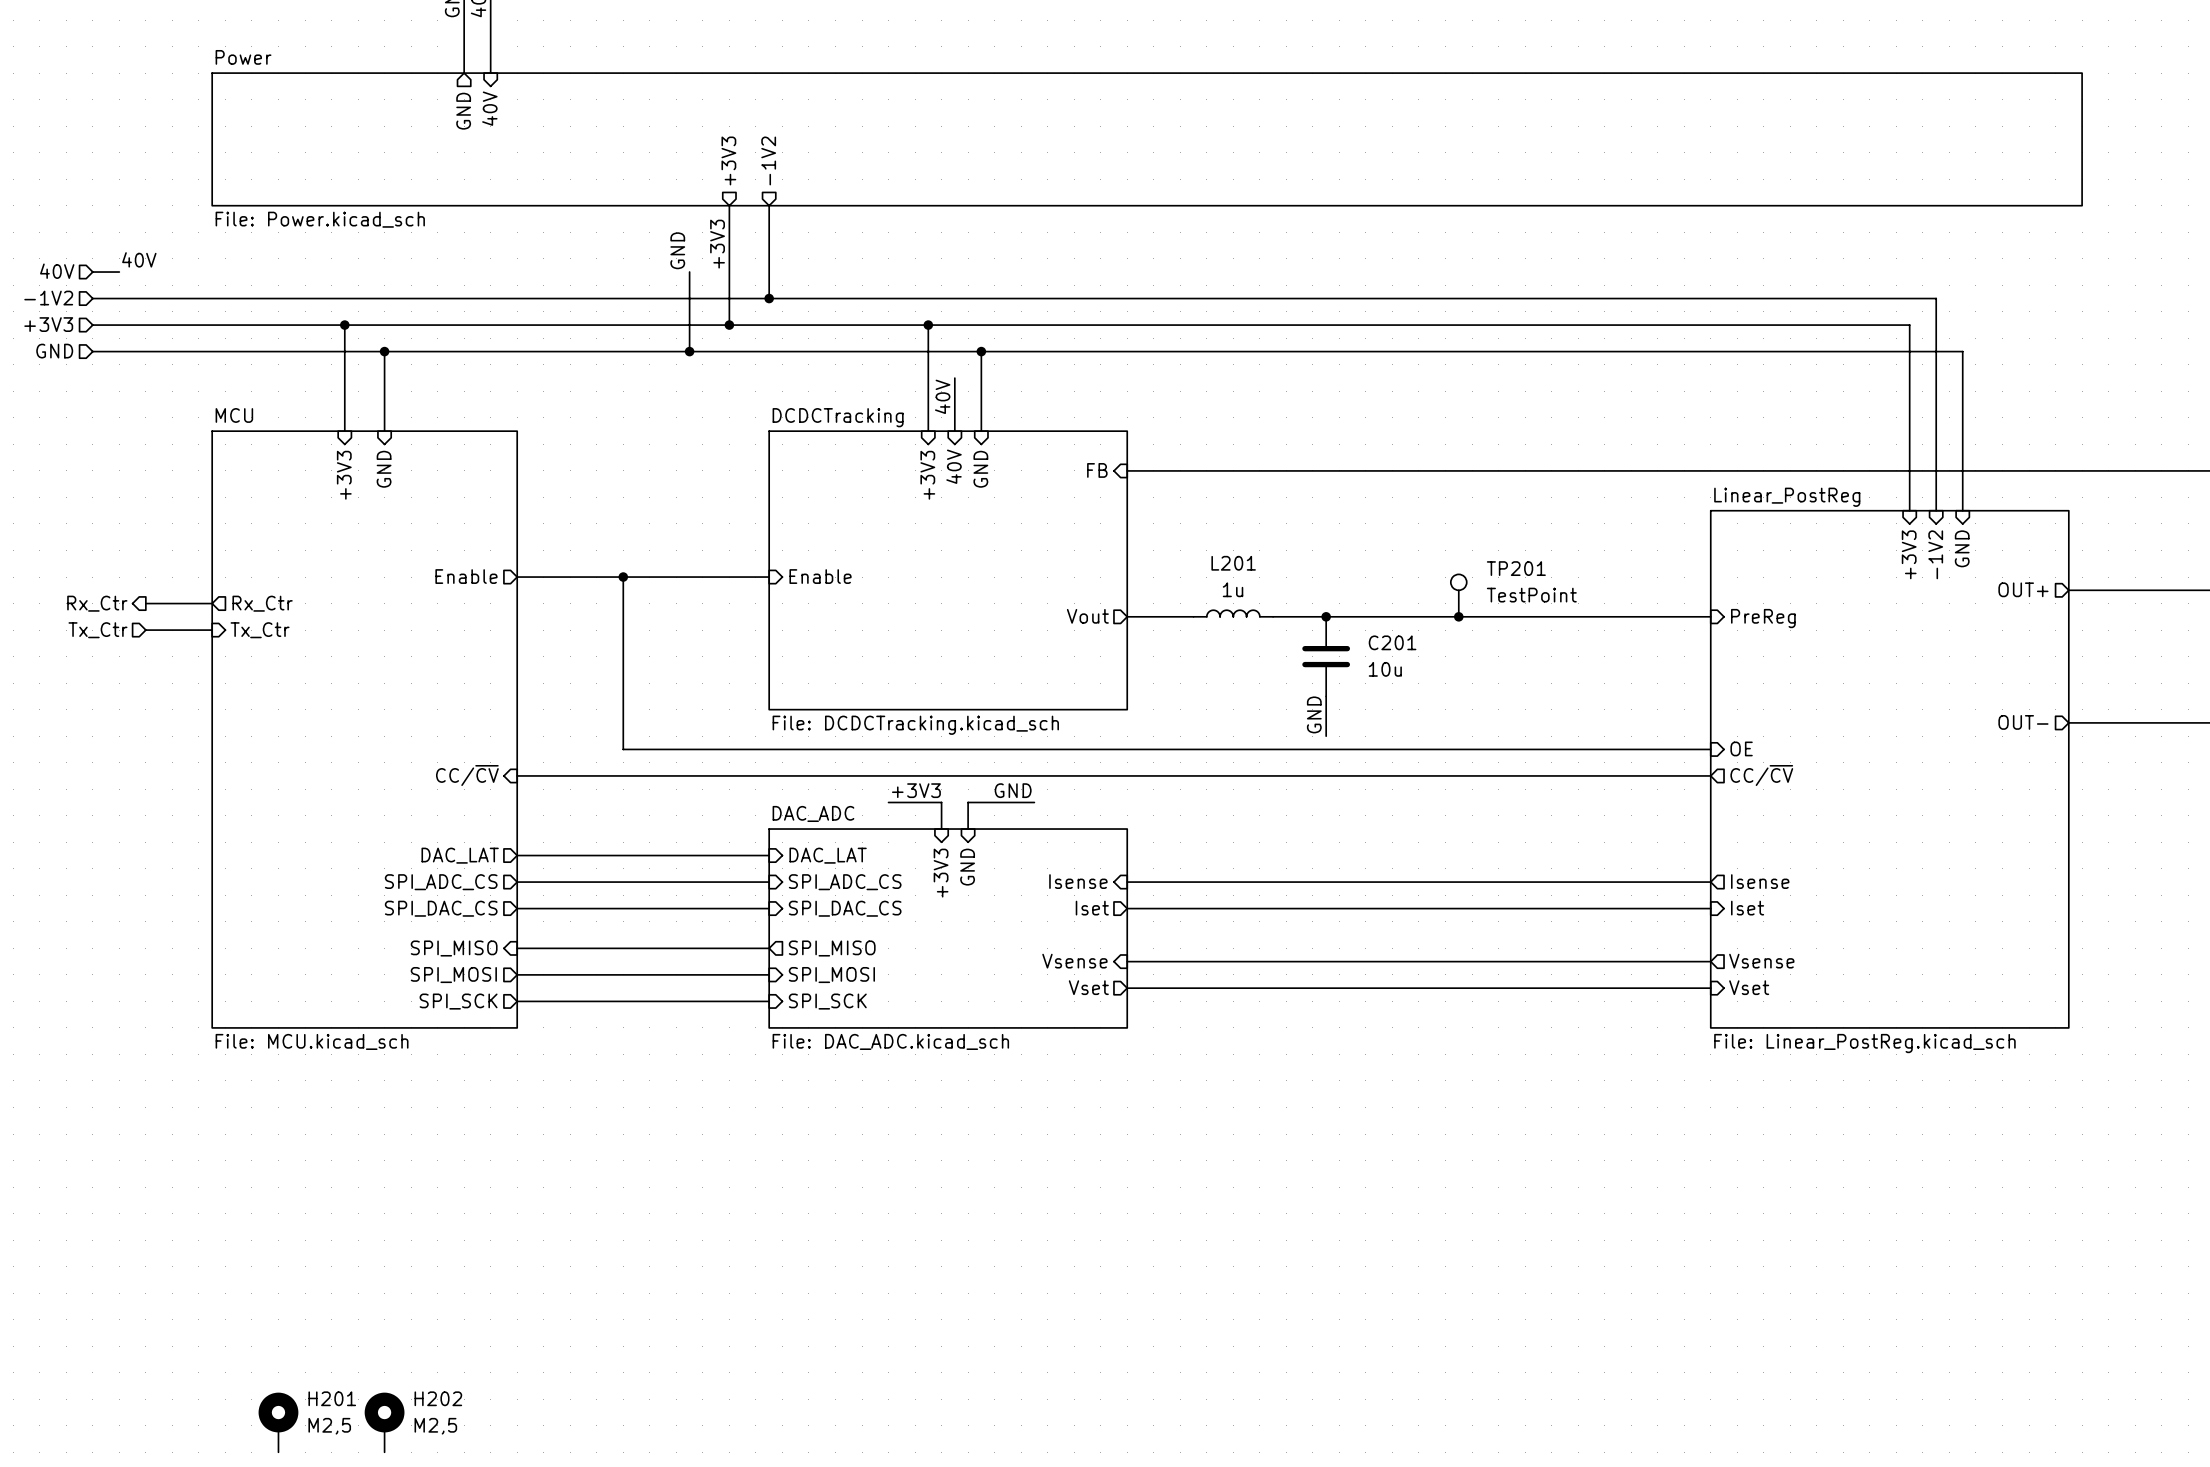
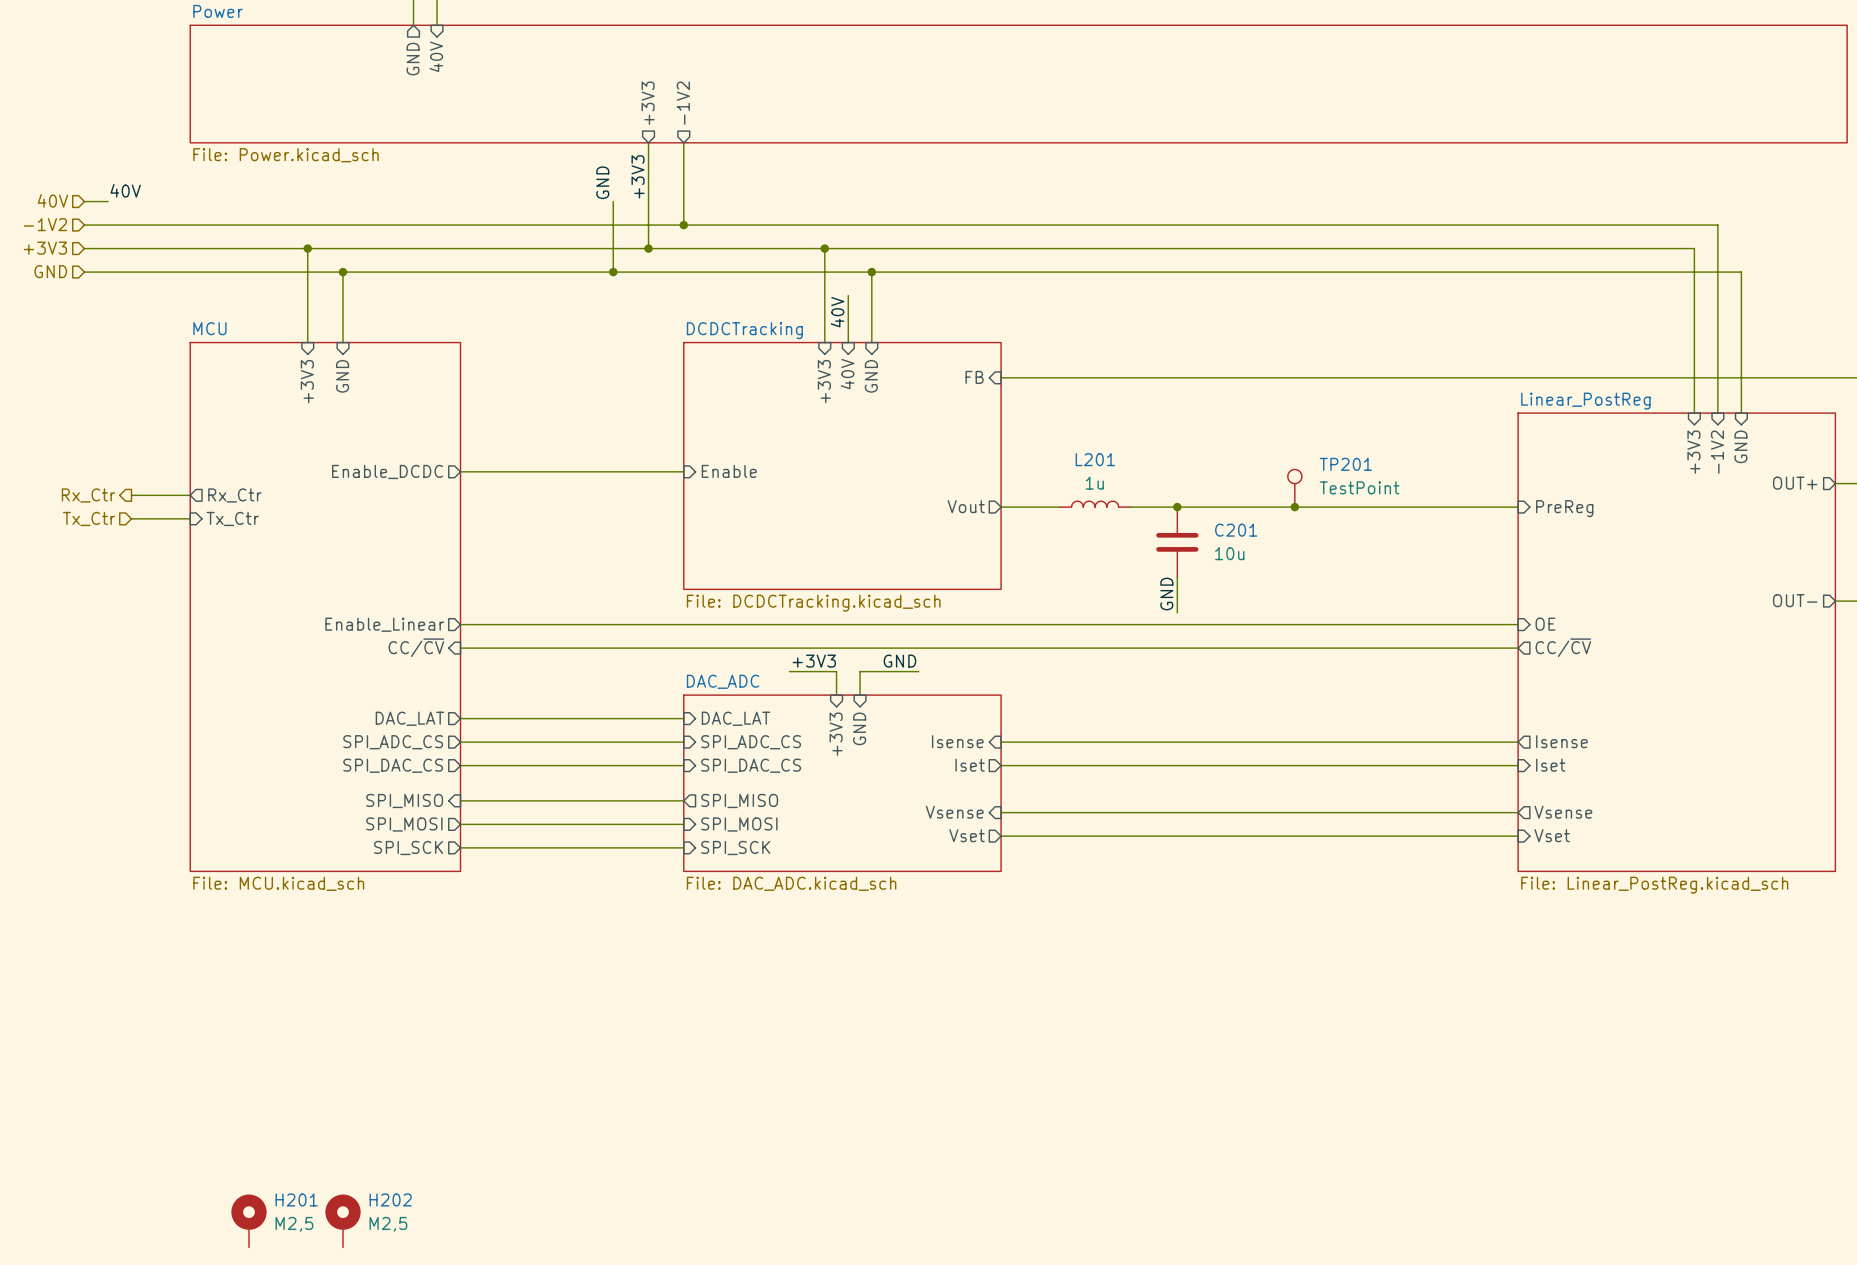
sheet pin: Enable (466, 576) -> Enable_DCDC (387, 471)
wire: (623, 577) (623, 749) -> (460, 624) (554, 624)
junction: (623, 577) -> none
sheet pin: none -> Enable_Linear (384, 624)

